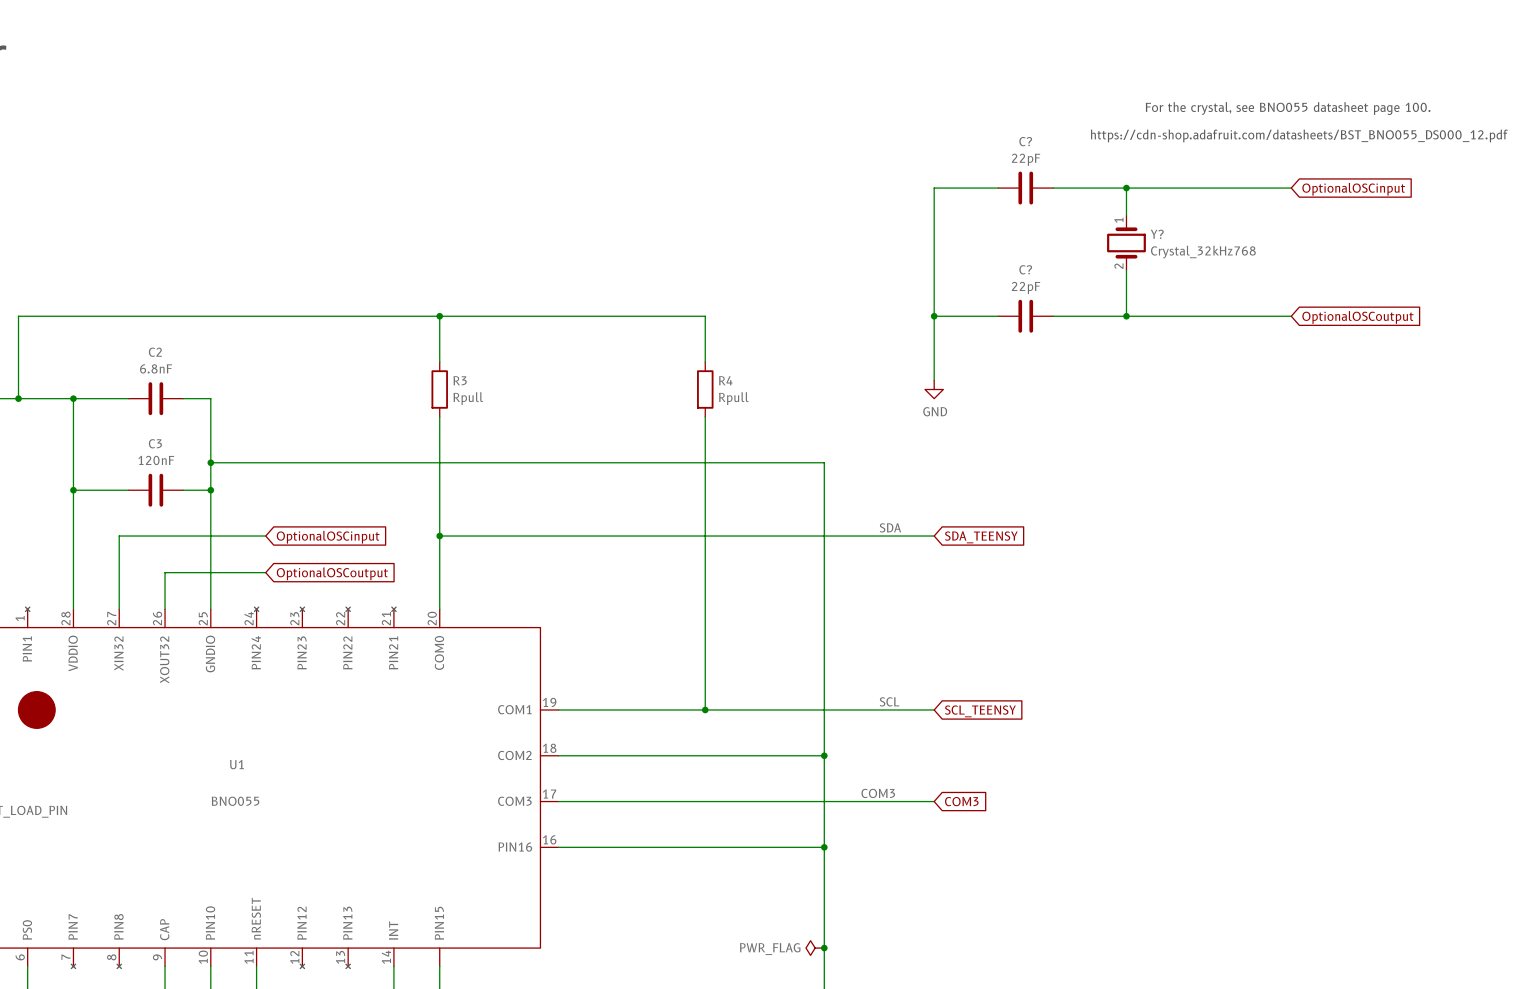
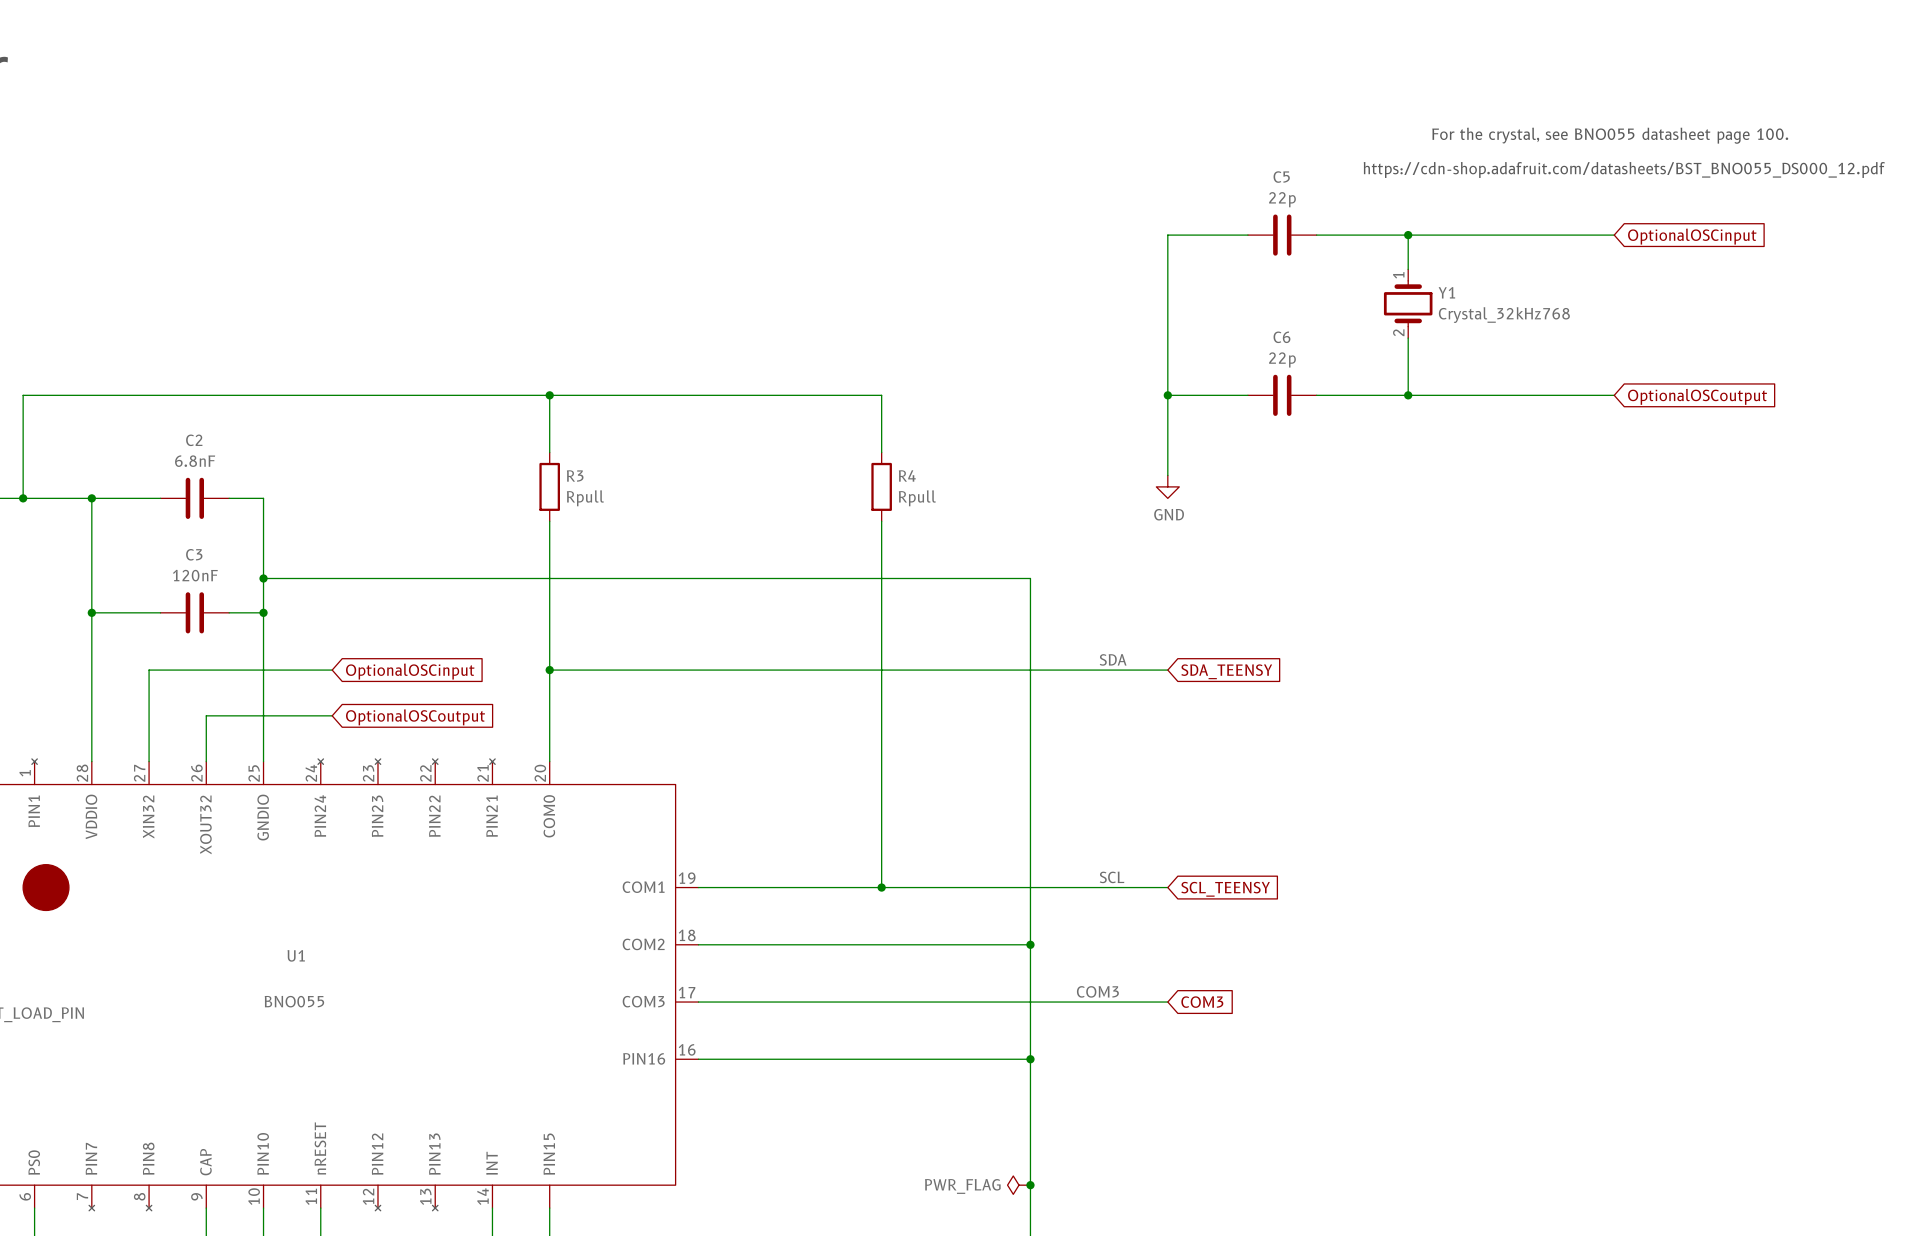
C? name: C? (1025, 141) -> C5 (1281, 177)
C? value: 22pF (1026, 159) -> 22p (1282, 199)
Y? name: Y? (1157, 234) -> Y1 (1446, 292)
C? name: C? (1025, 269) -> C6 (1281, 337)
C? value: 22pF (1026, 287) -> 22p (1282, 359)

